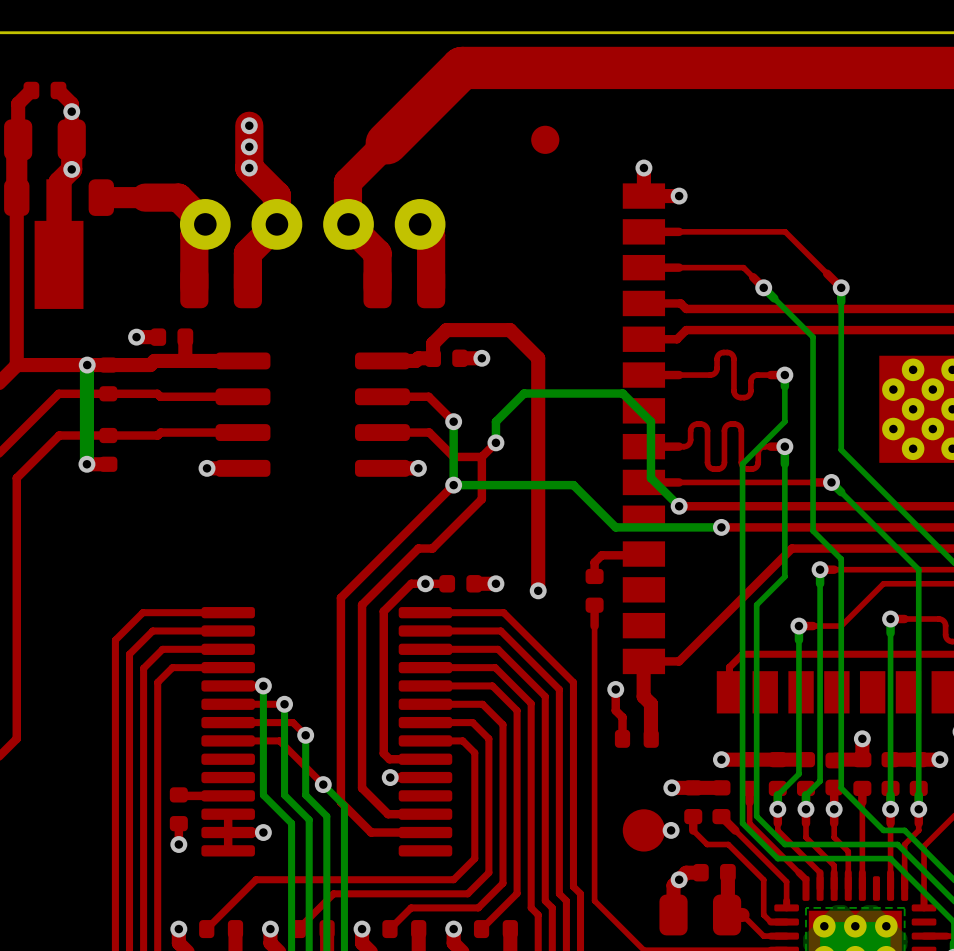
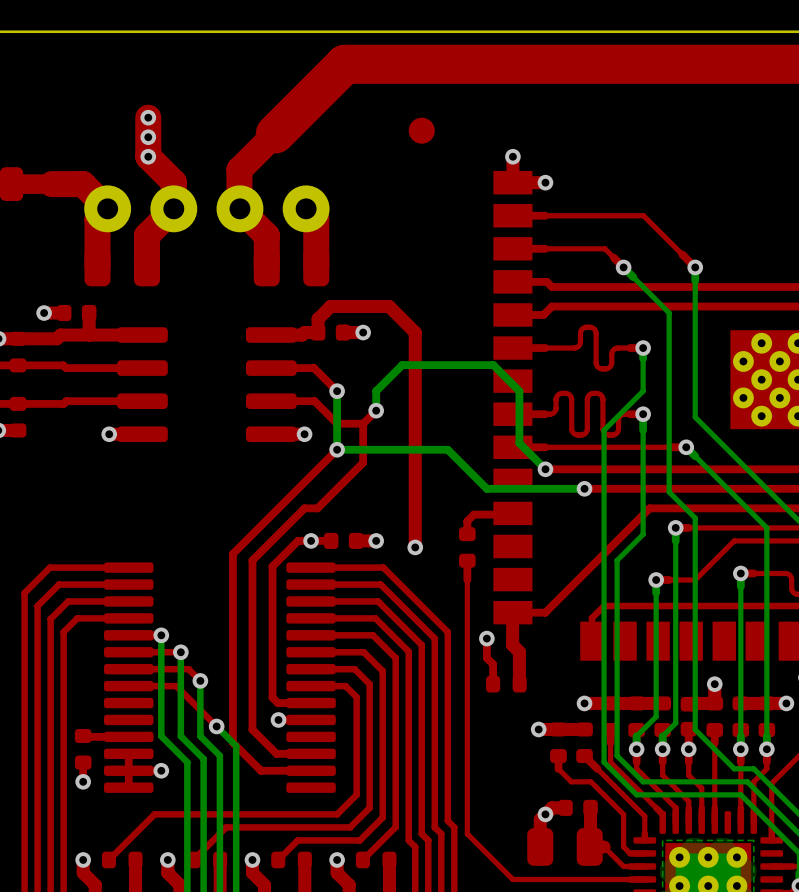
part: (643, 830) -> none
via: (671, 830) -> none

